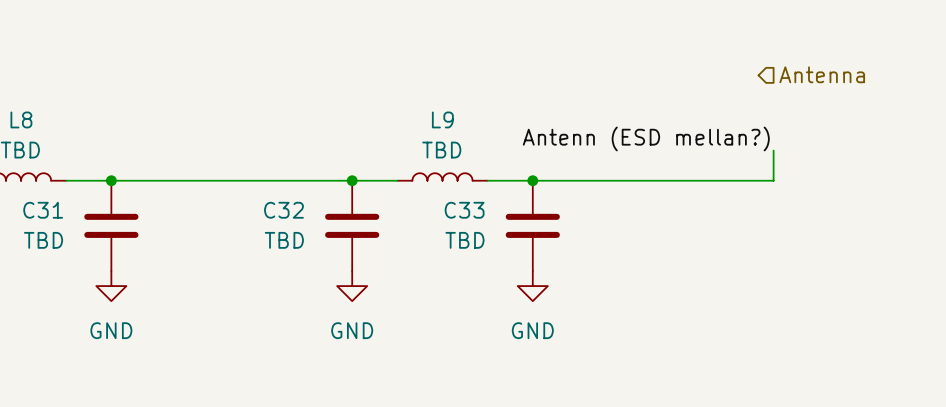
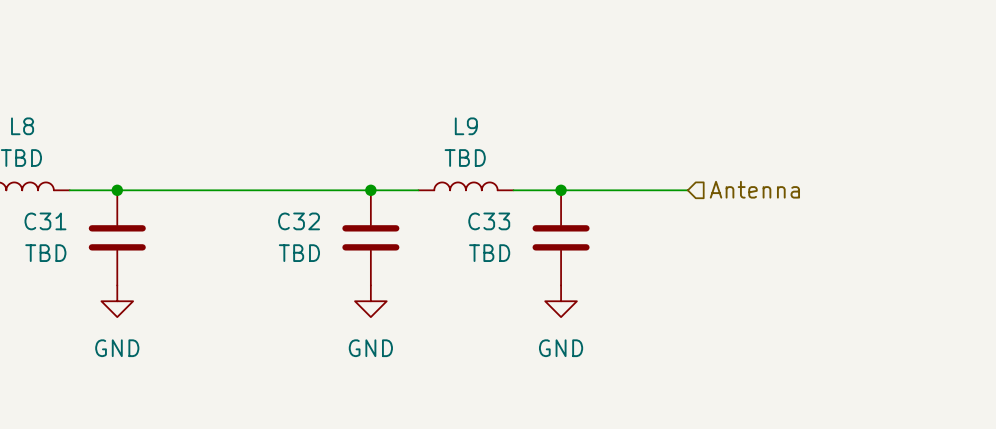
hierarchical label position: Antenna (822, 74) -> Antenna (754, 189)
label: Antenn (ESD mellan?) (646, 138) -> none
wire: (773, 150) (773, 180) (653, 180) -> none

